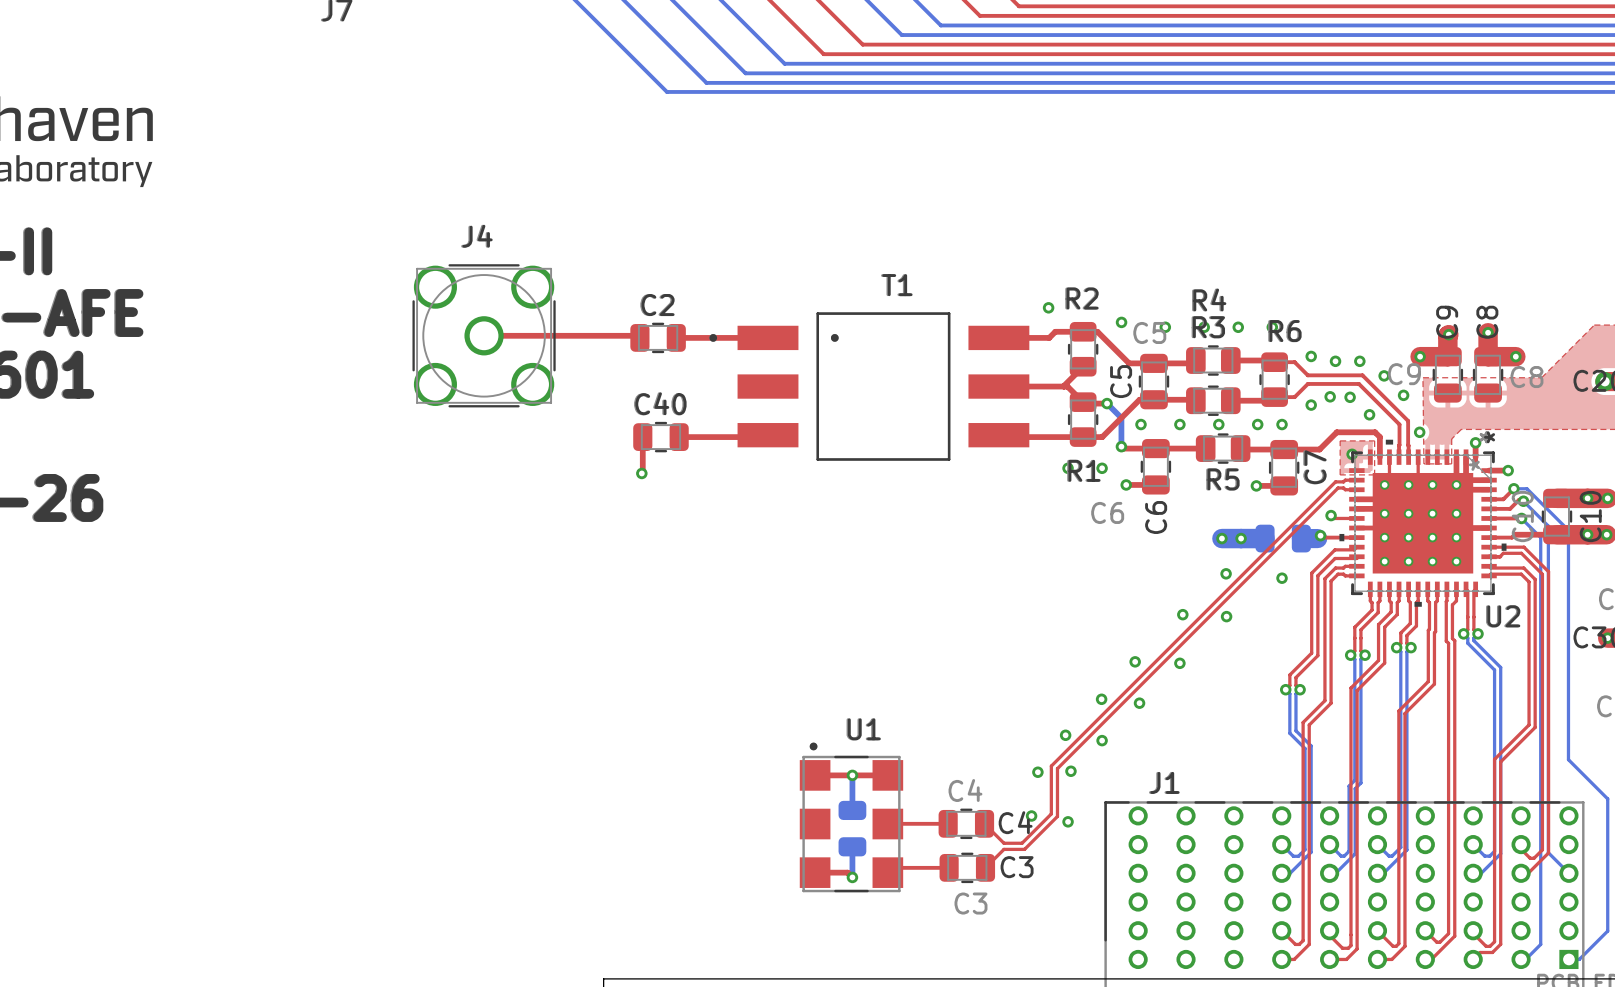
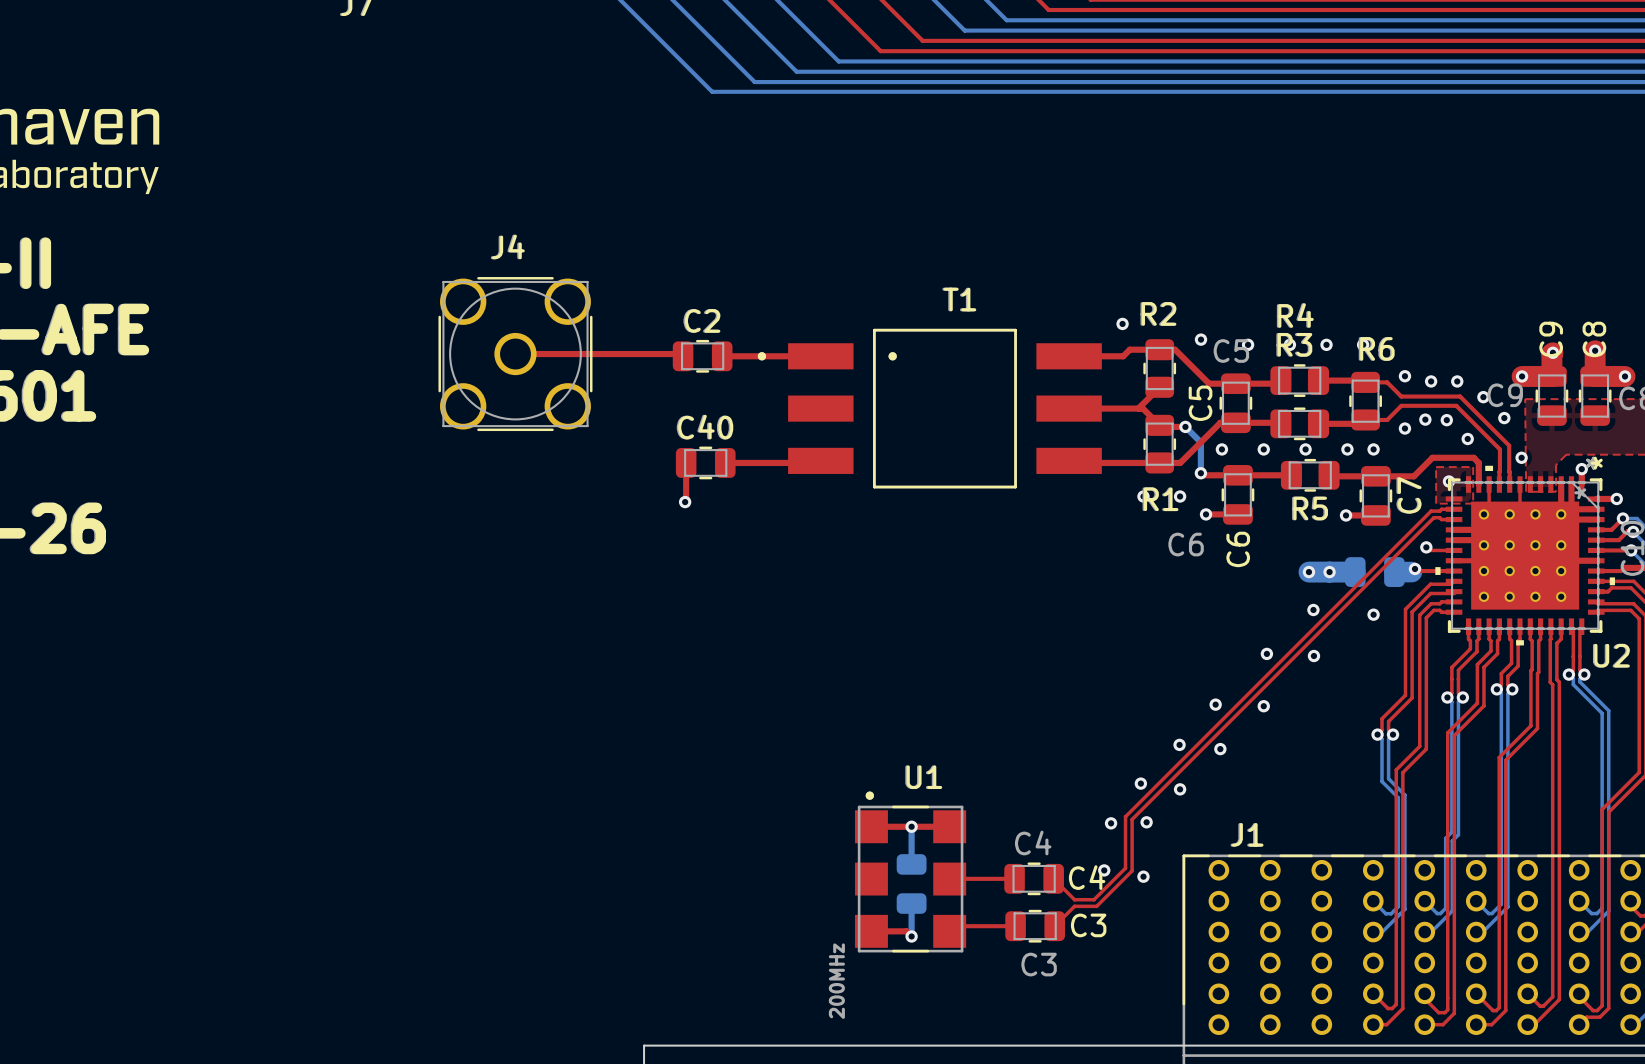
U1 value: none -> 200MHz (836, 981)

